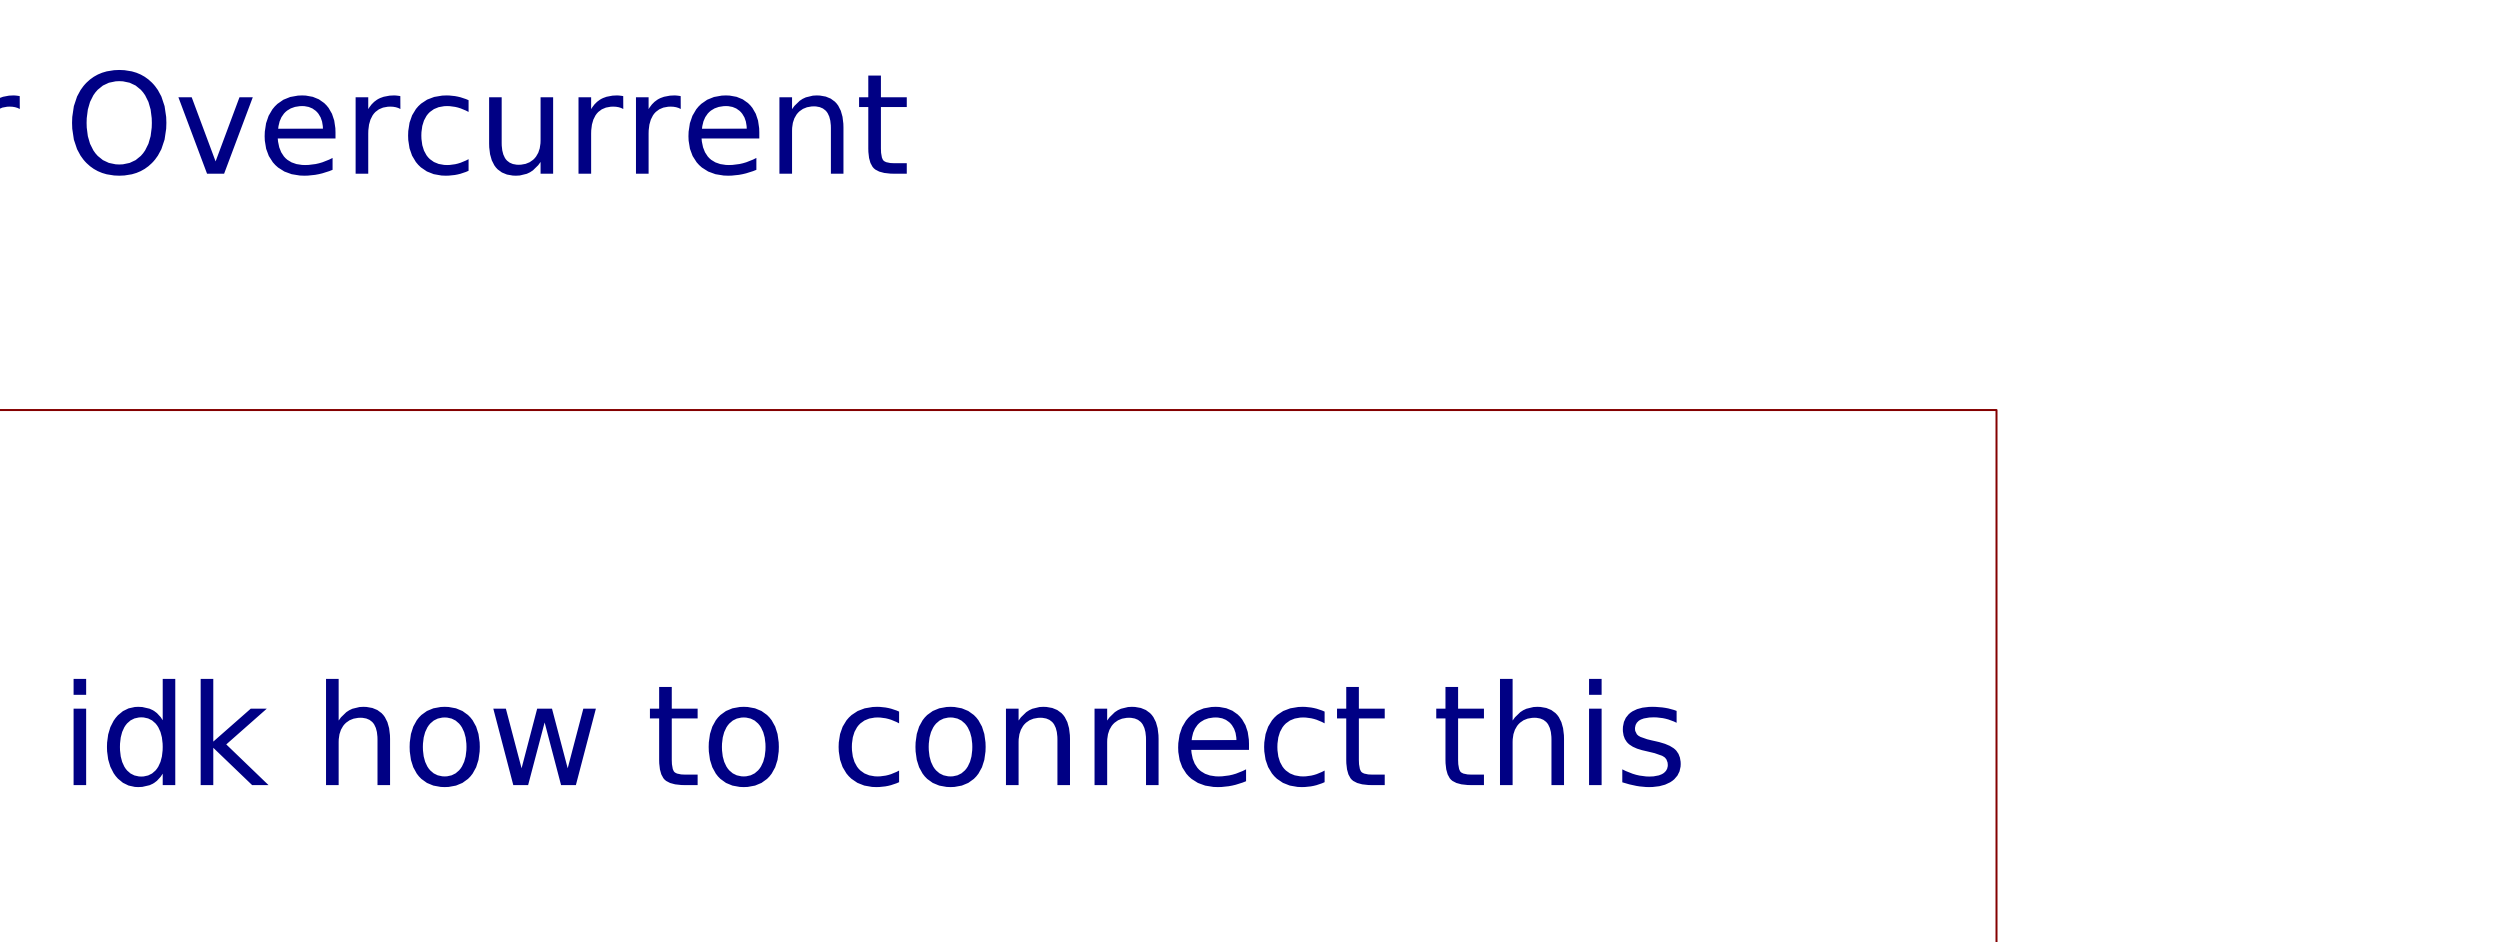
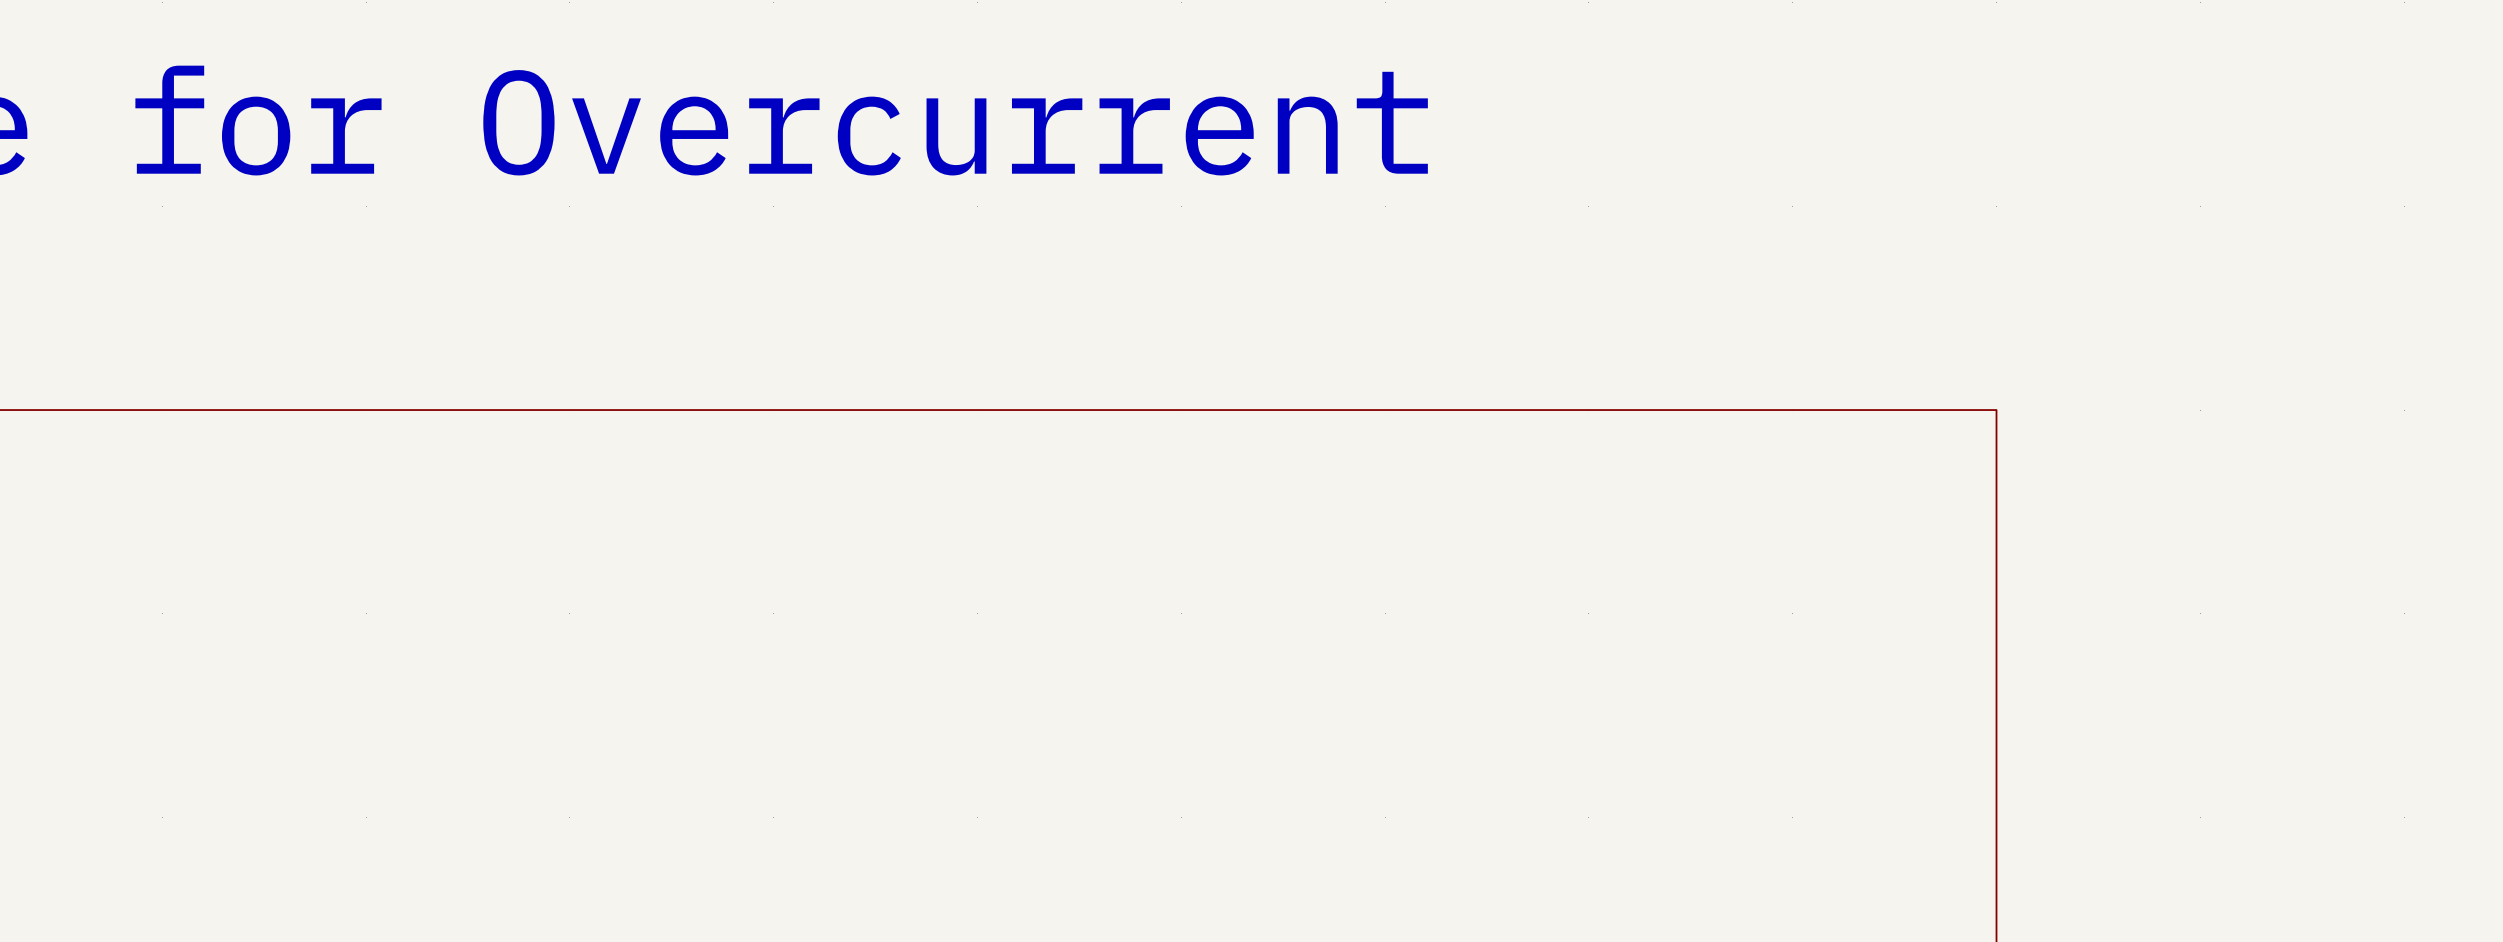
text: idk how to connect this (877, 732) -> none

